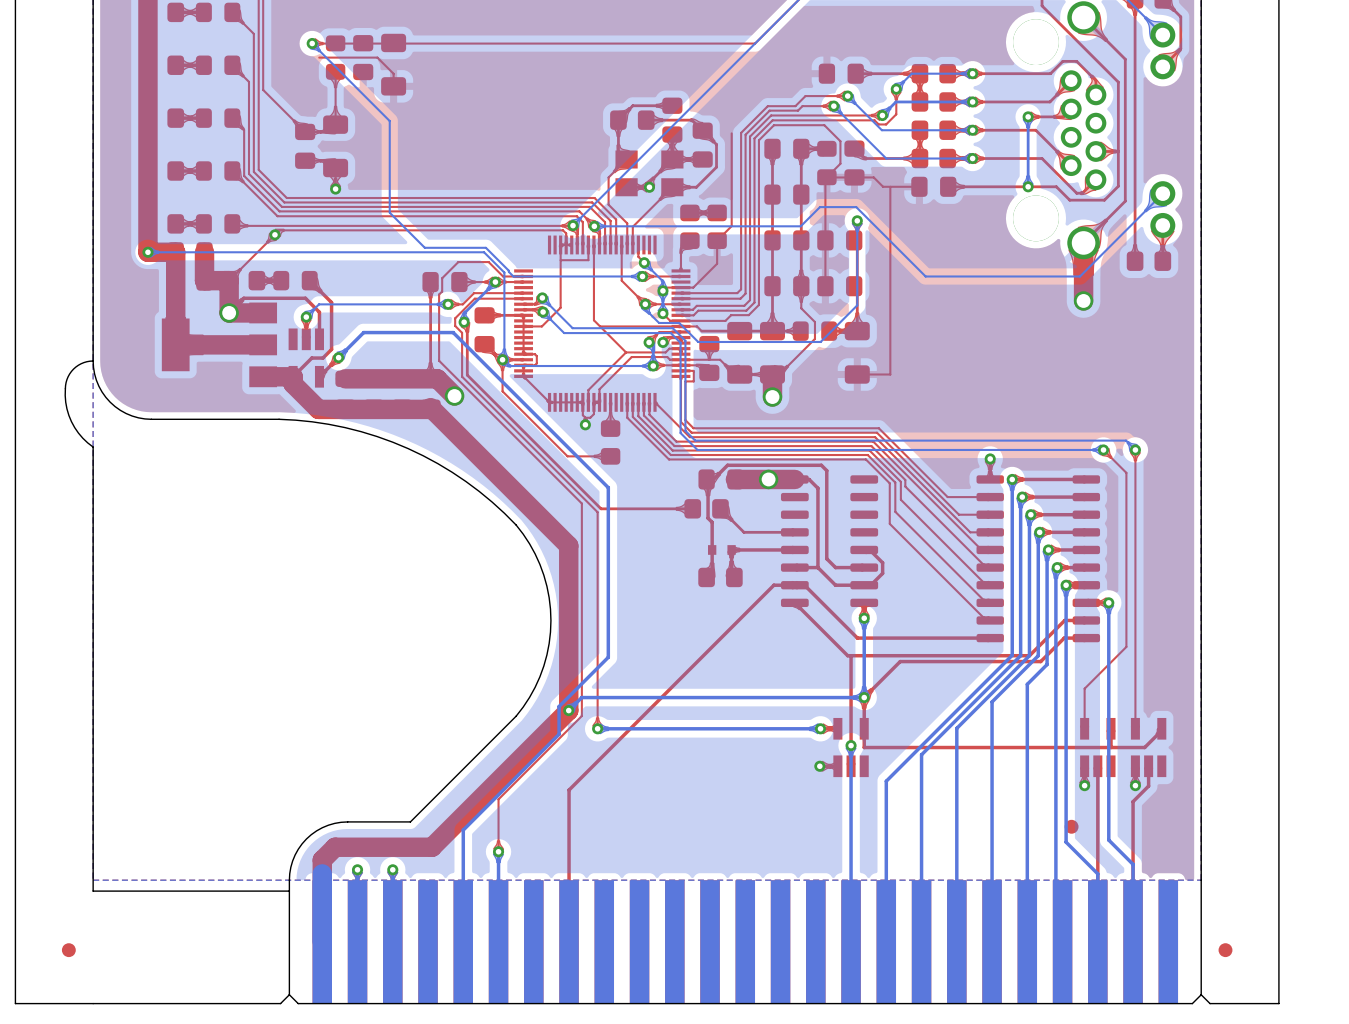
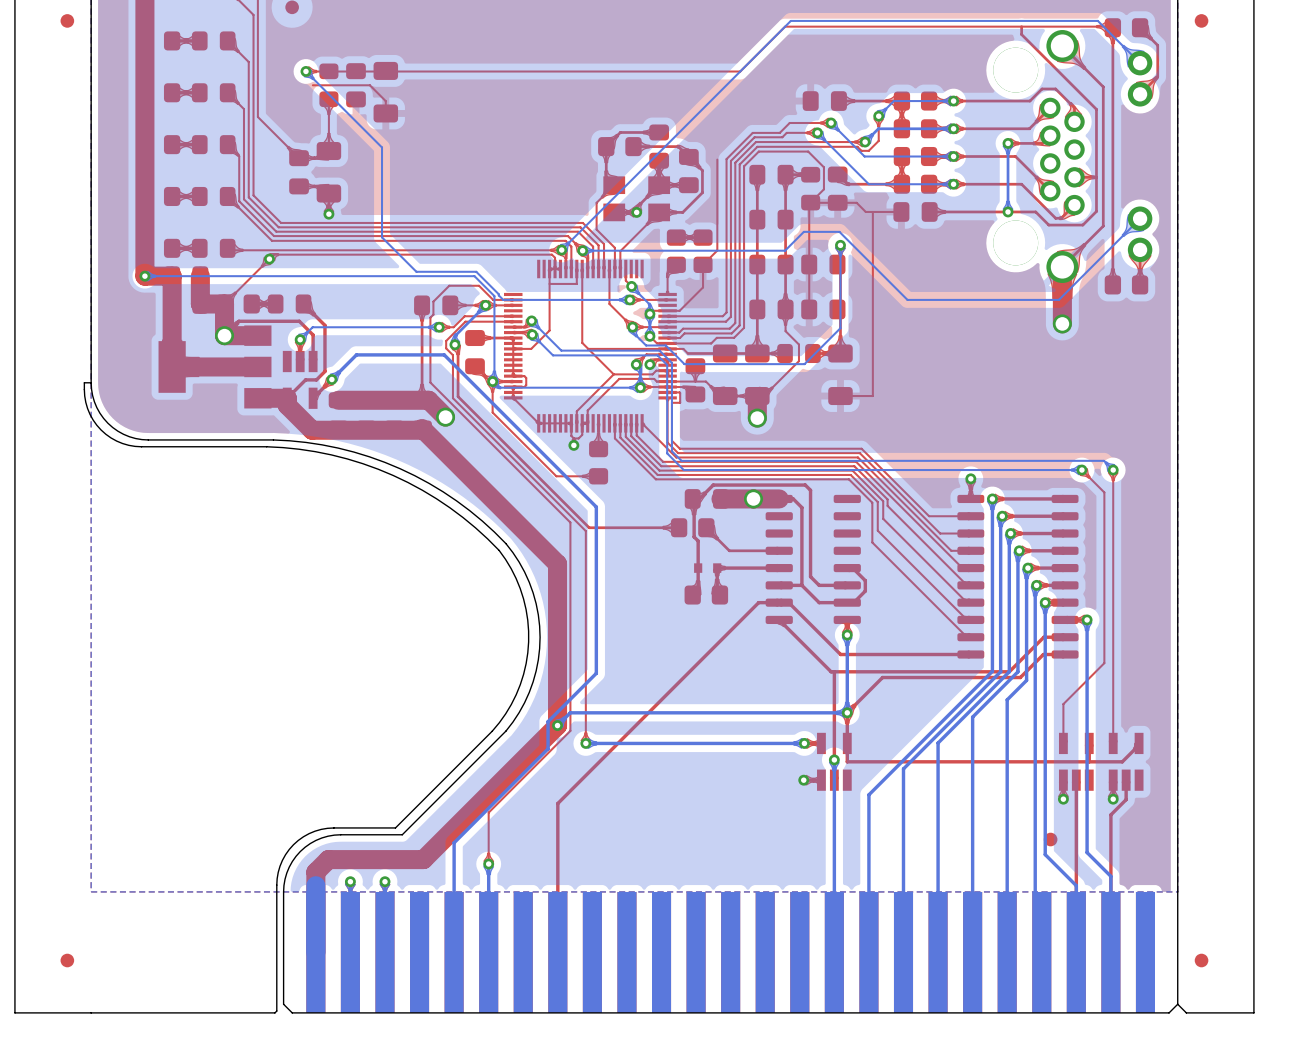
board edge: (93, 361) (81, 363) (71, 371) (66, 382) (65, 395) (71, 421) (78, 433) (93, 447) (93, 891) (289, 891) -> (91, 382) (84, 382) (85, 402) (90, 414) (105, 434) (122, 443) (141, 446) (266, 446) (299, 449) (347, 458) (378, 469) (407, 482) (436, 498) (462, 517) (499, 550) (516, 578) (523, 598) (528, 631) (526, 663) (516, 694) (505, 713) (492, 731) (395, 827) (321, 829) (303, 836) (285, 854) (280, 866) (276, 885) (276, 1011)
board edge: (289, 994) (282, 1001) -> none

